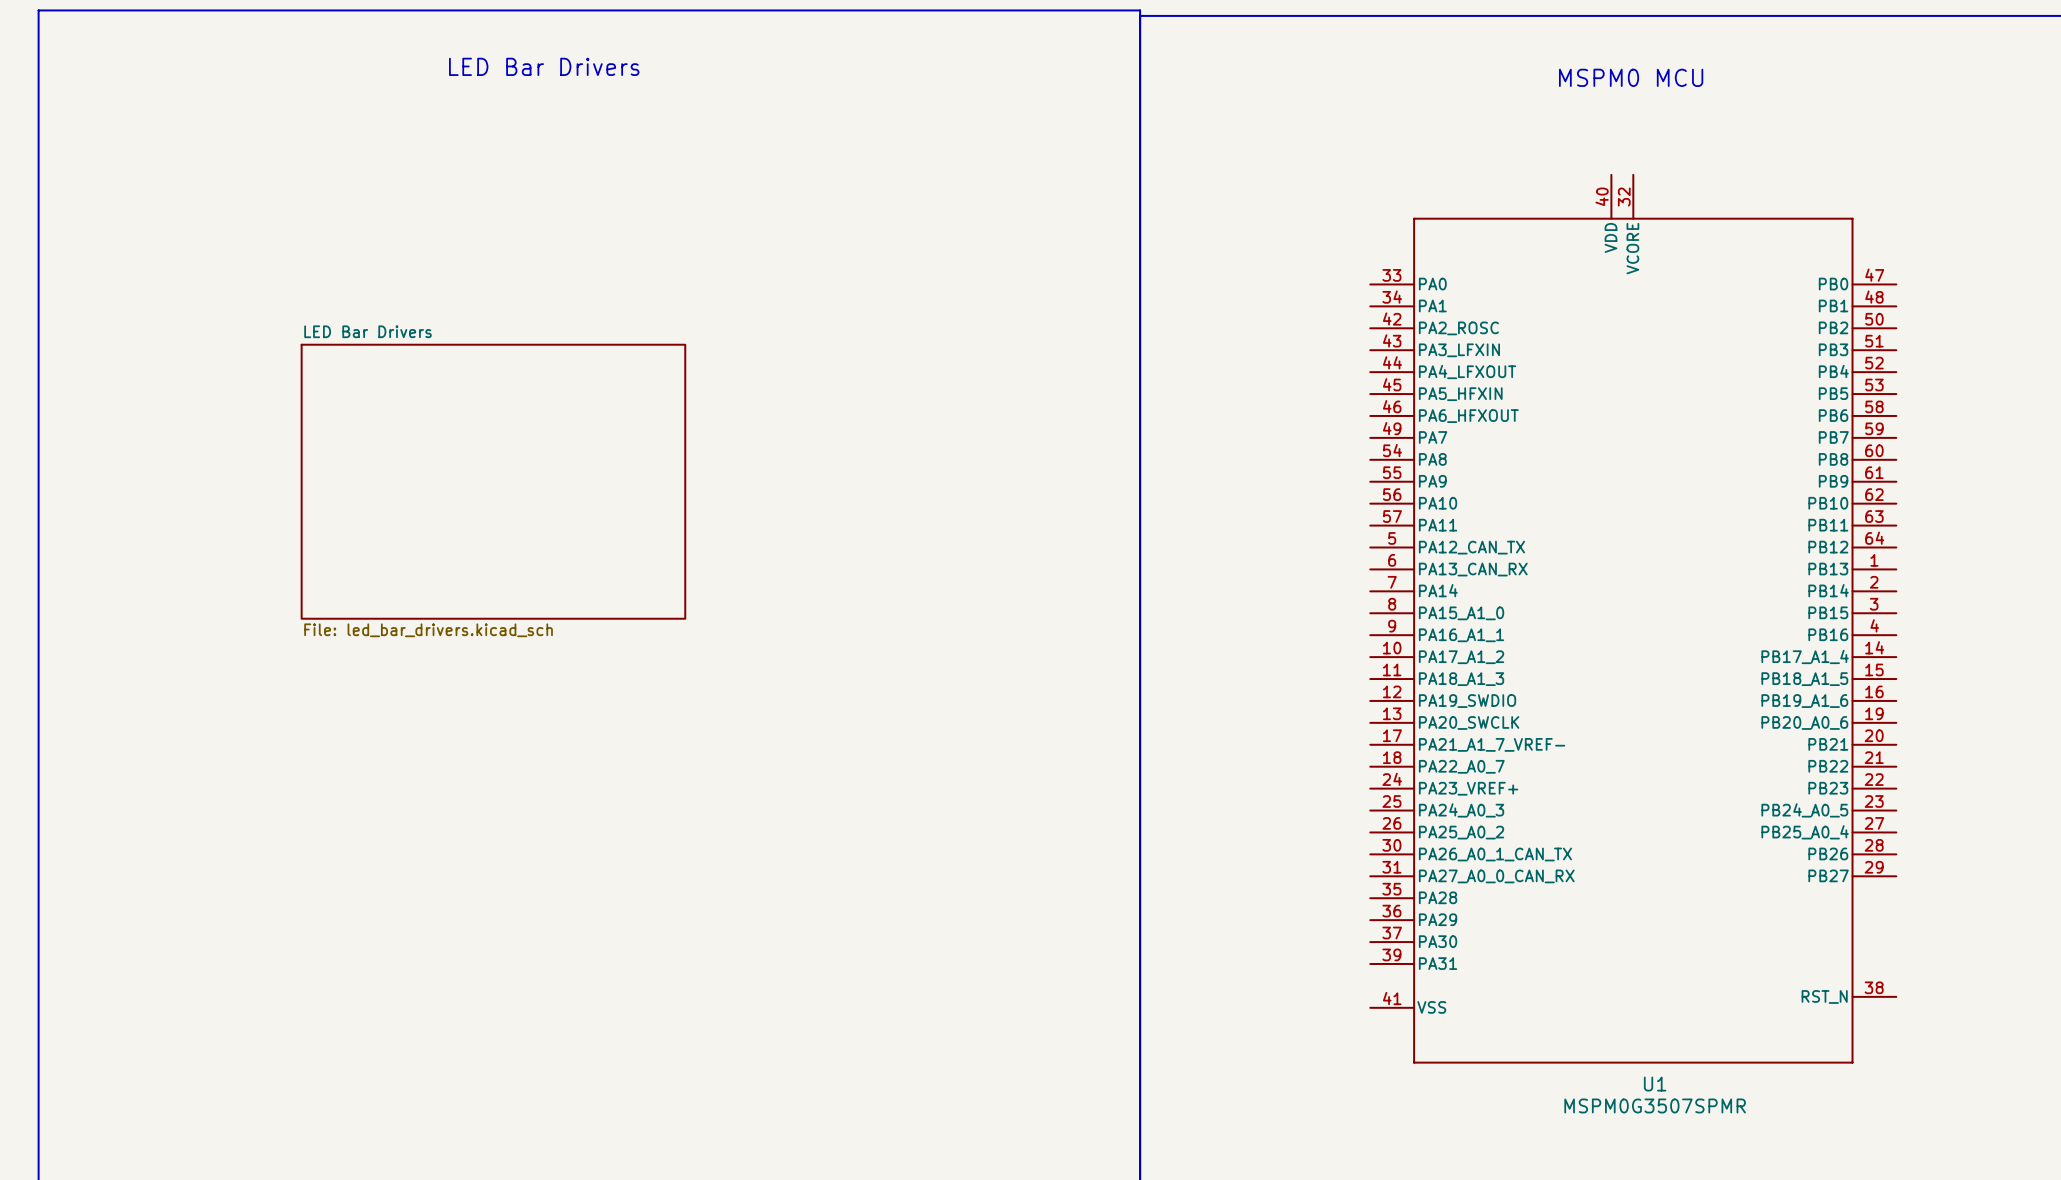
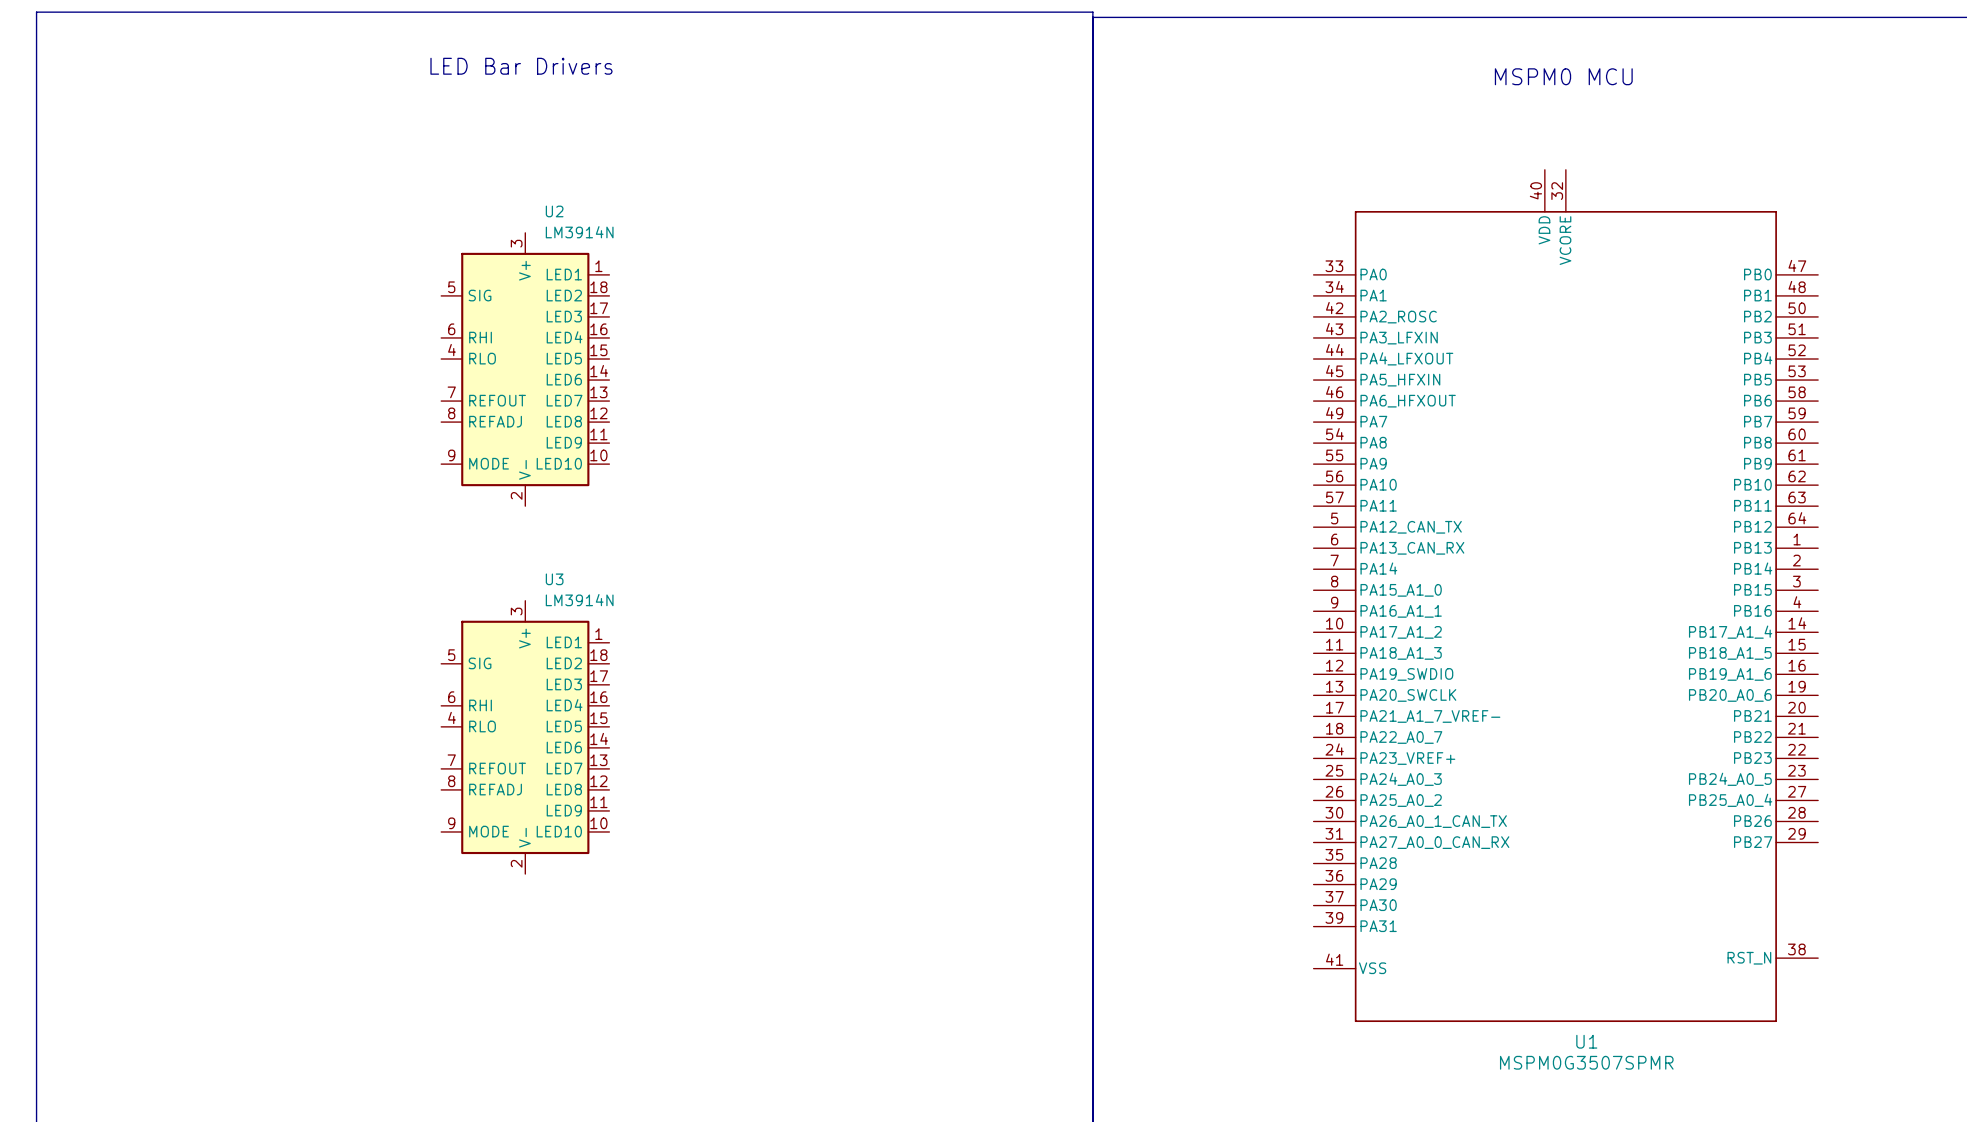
U2: none -> LM3914N (525, 369)
sheet LED Bar Drivers: File: led_bar_drivers.kicad_sch (493, 481) -> none
U3: none -> LM3914N (525, 737)

